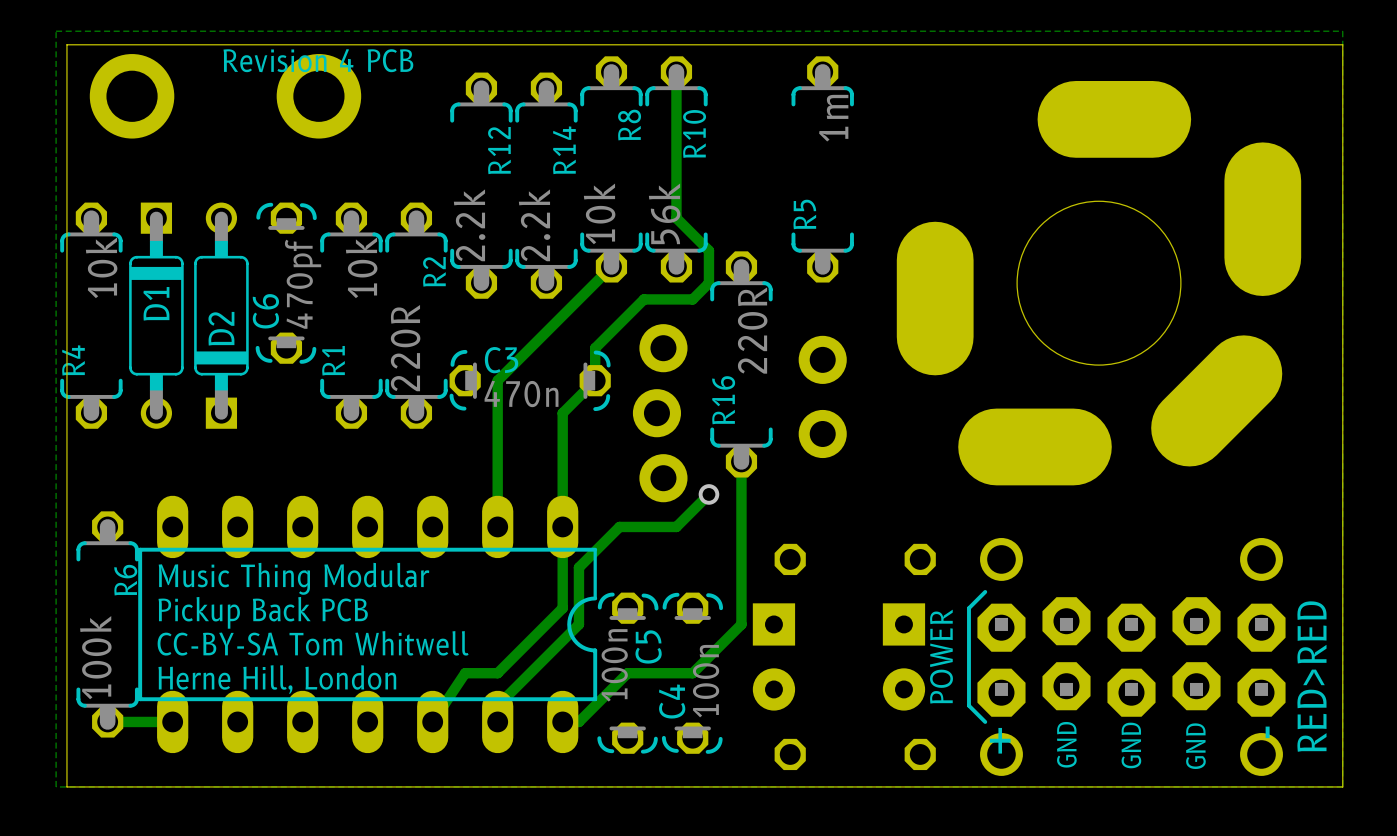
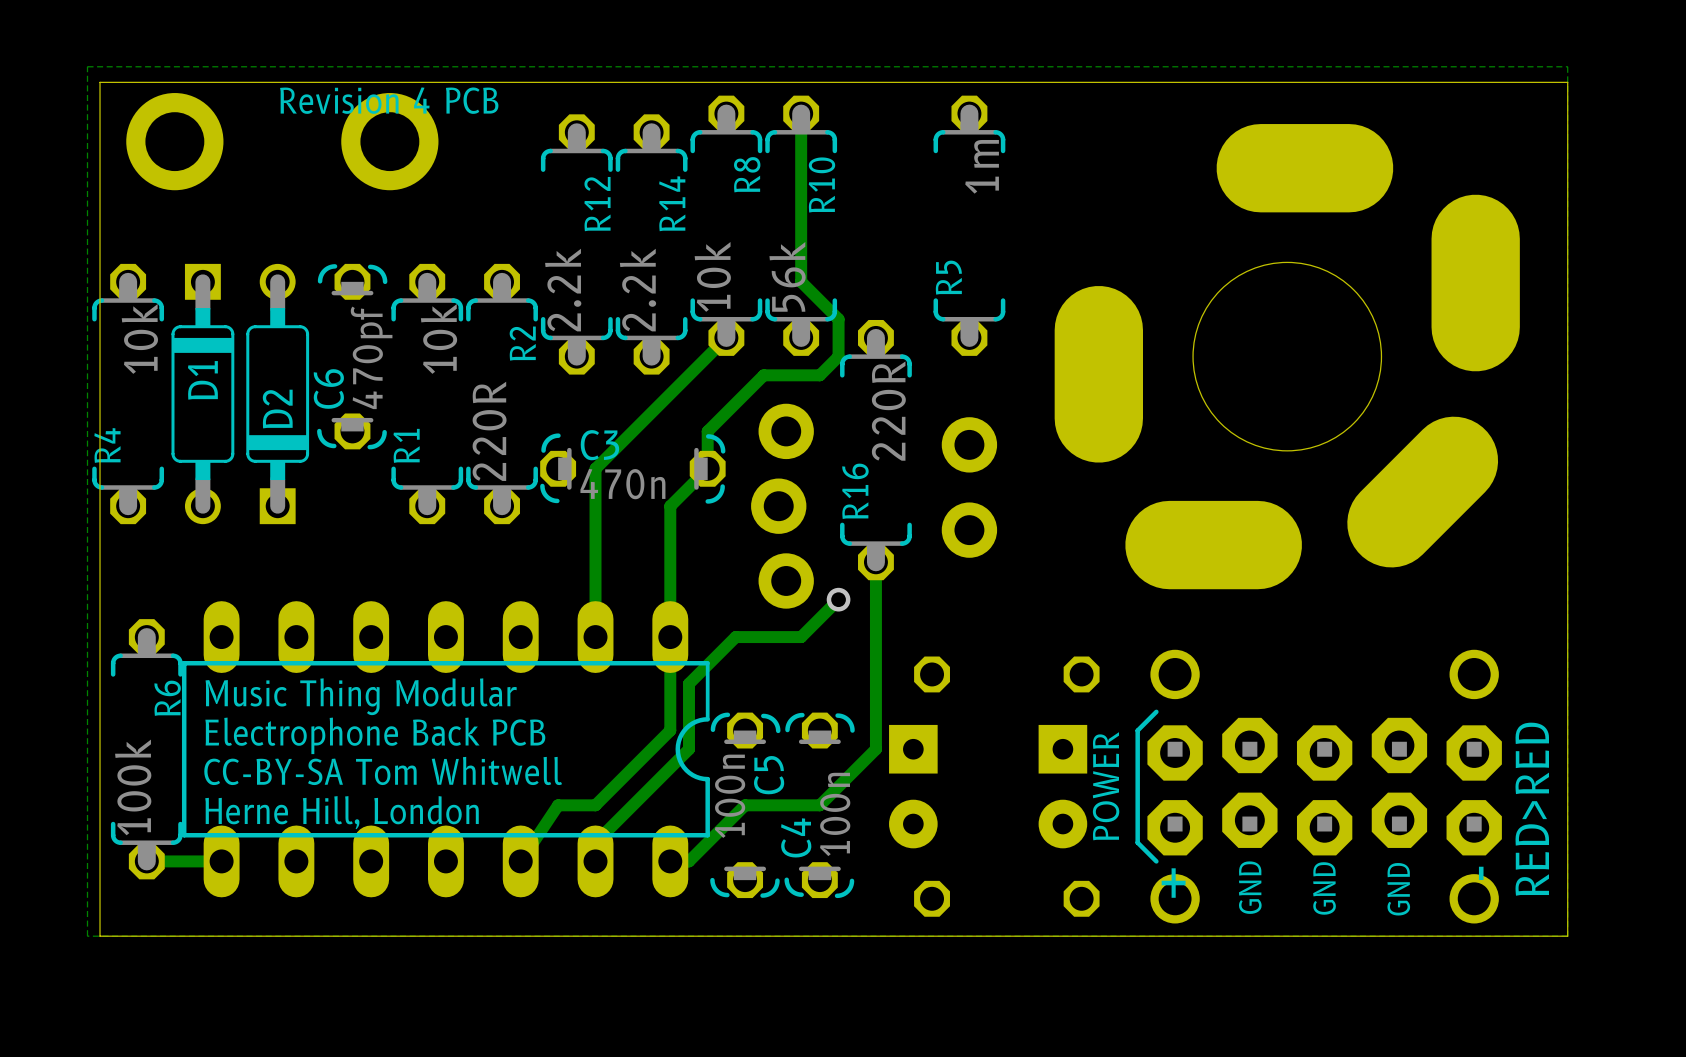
text: Pickup Back PCB (263, 612) -> Electrophone Back PCB (375, 735)

